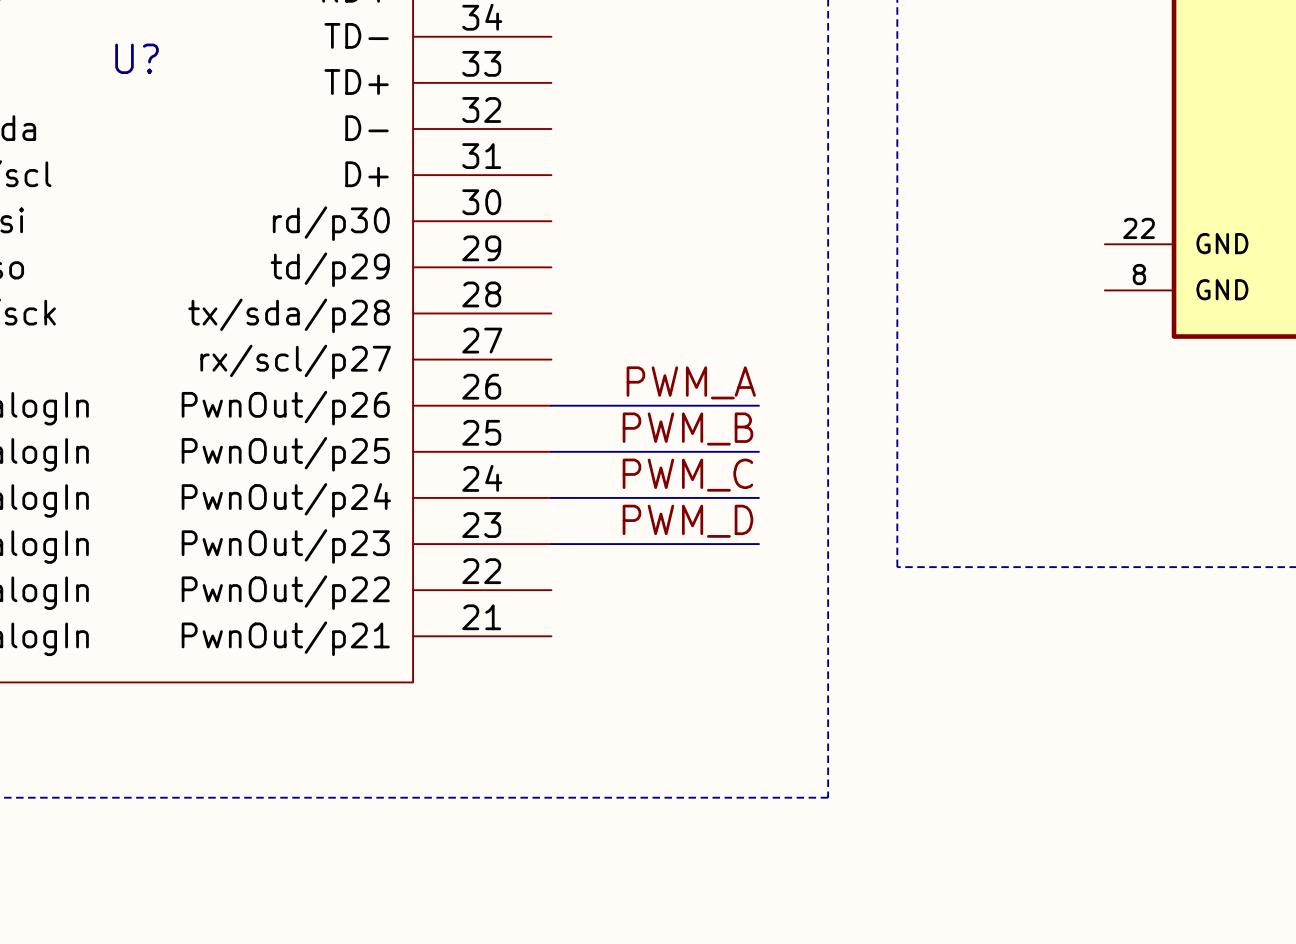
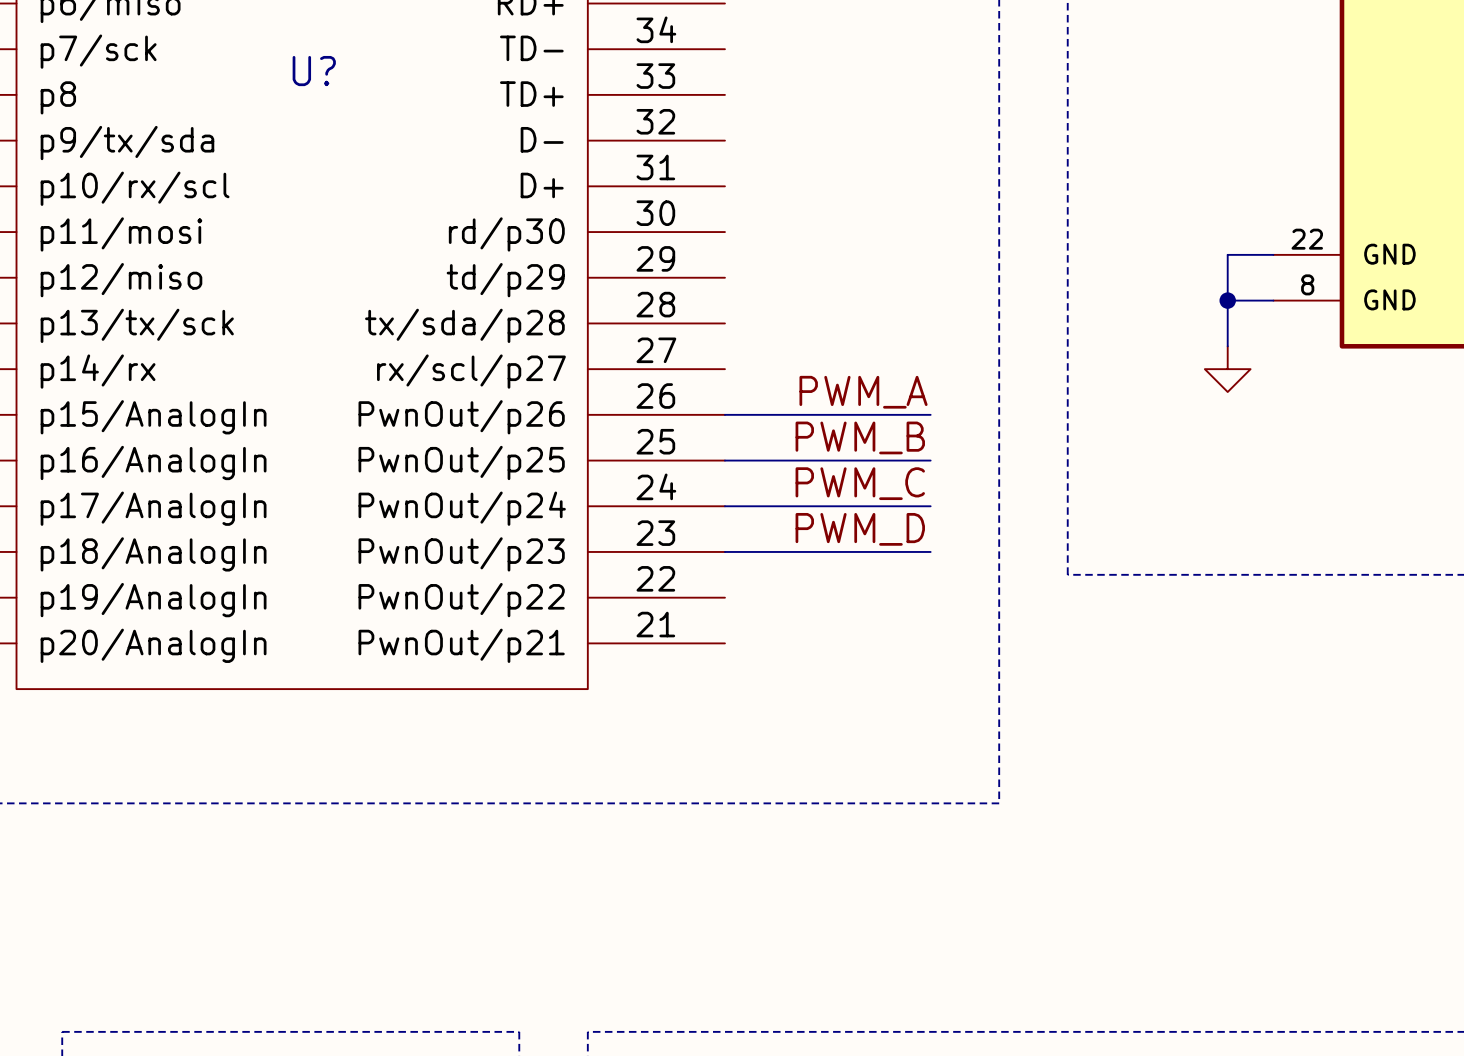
wire: none -> (1273, 254) (1227, 254) (1227, 346)
wire: none -> (1227, 300) (1273, 300)
junction: none -> (1227, 300)
power symbol: none -> (1227, 369)

